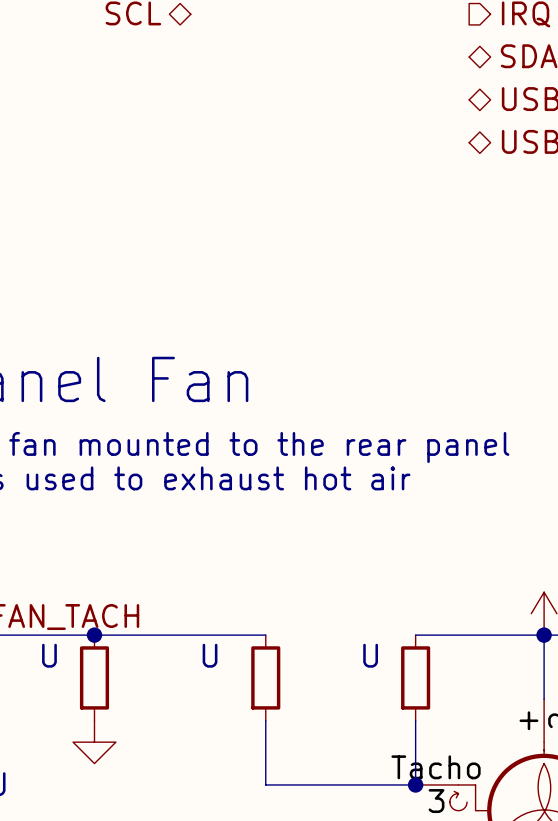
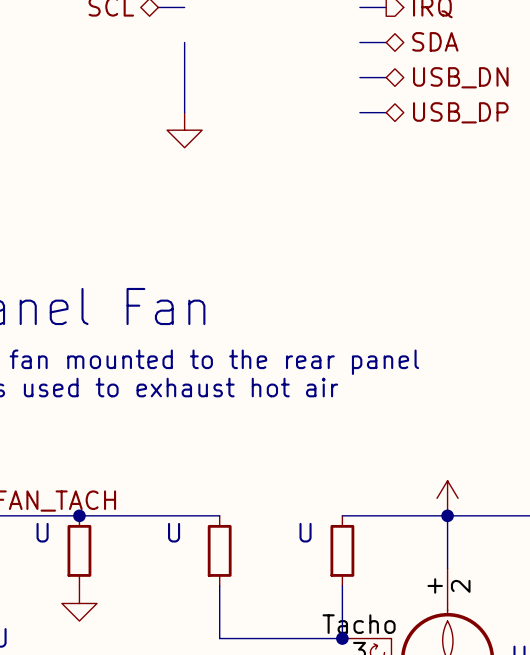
wire: none -> (158, 7) (184, 7)
wire: none -> (359, 7) (386, 7)
wire: none -> (184, 42) (184, 112)
wire: none -> (359, 42) (386, 42)
wire: none -> (359, 77) (386, 77)
wire: none -> (359, 112) (386, 112)
power symbol: none -> (184, 130)

